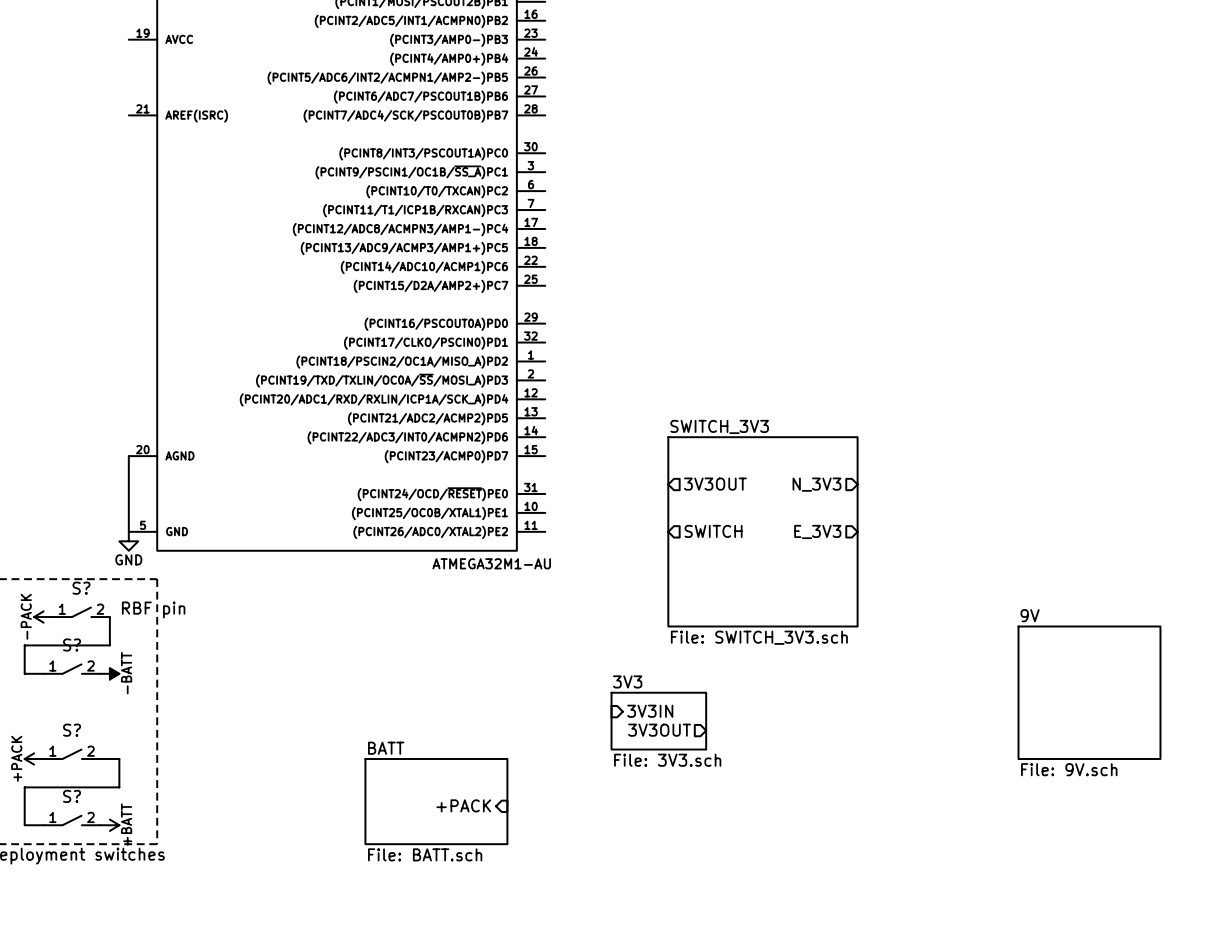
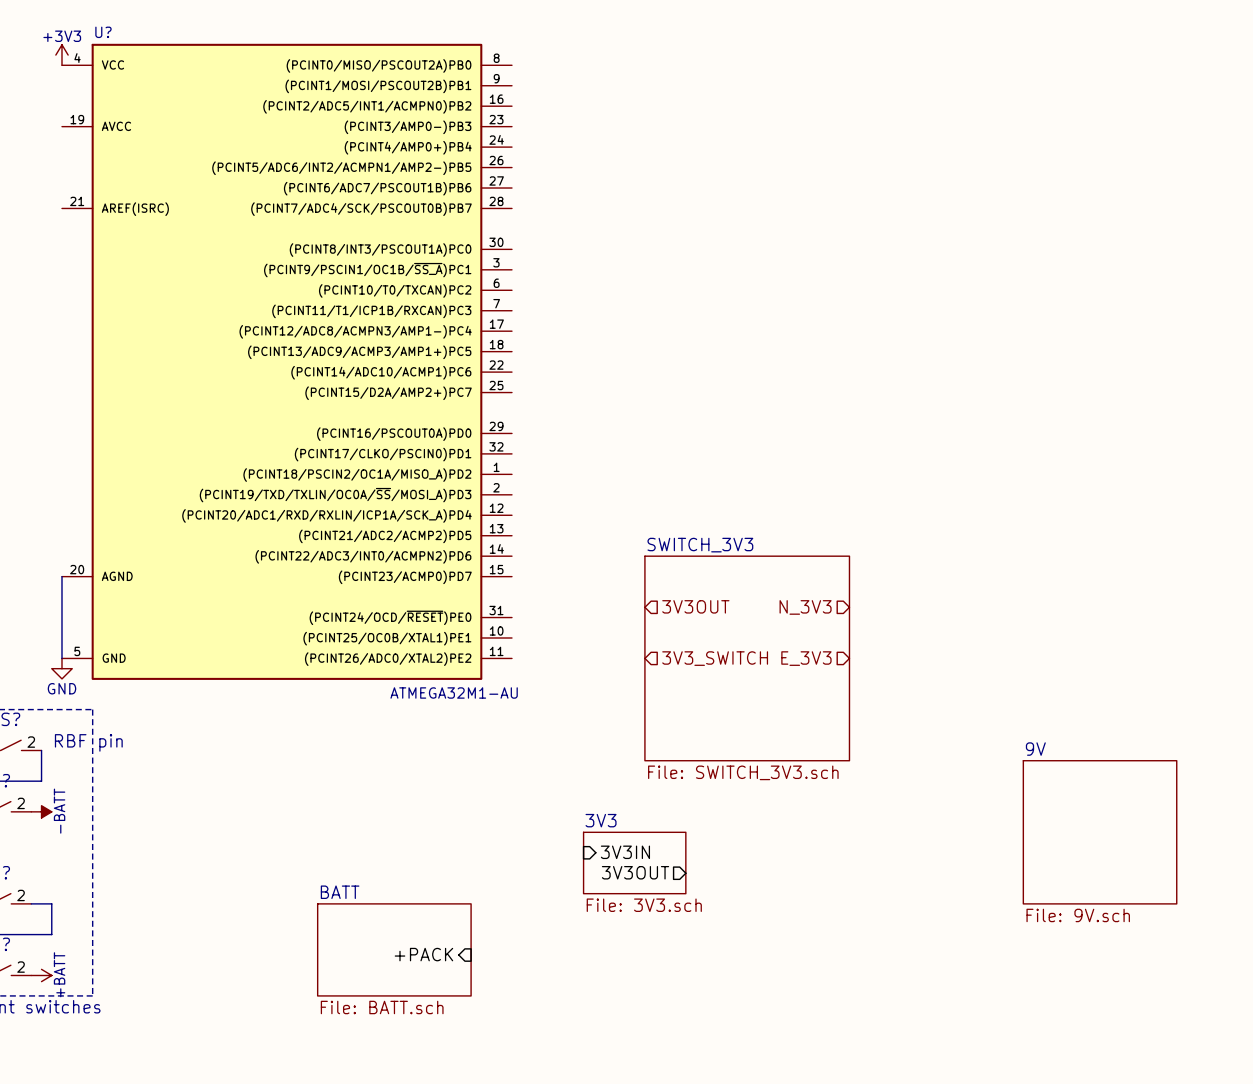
hierarchical label: SWITCH (713, 531) -> 3V3_SWITCH (715, 658)

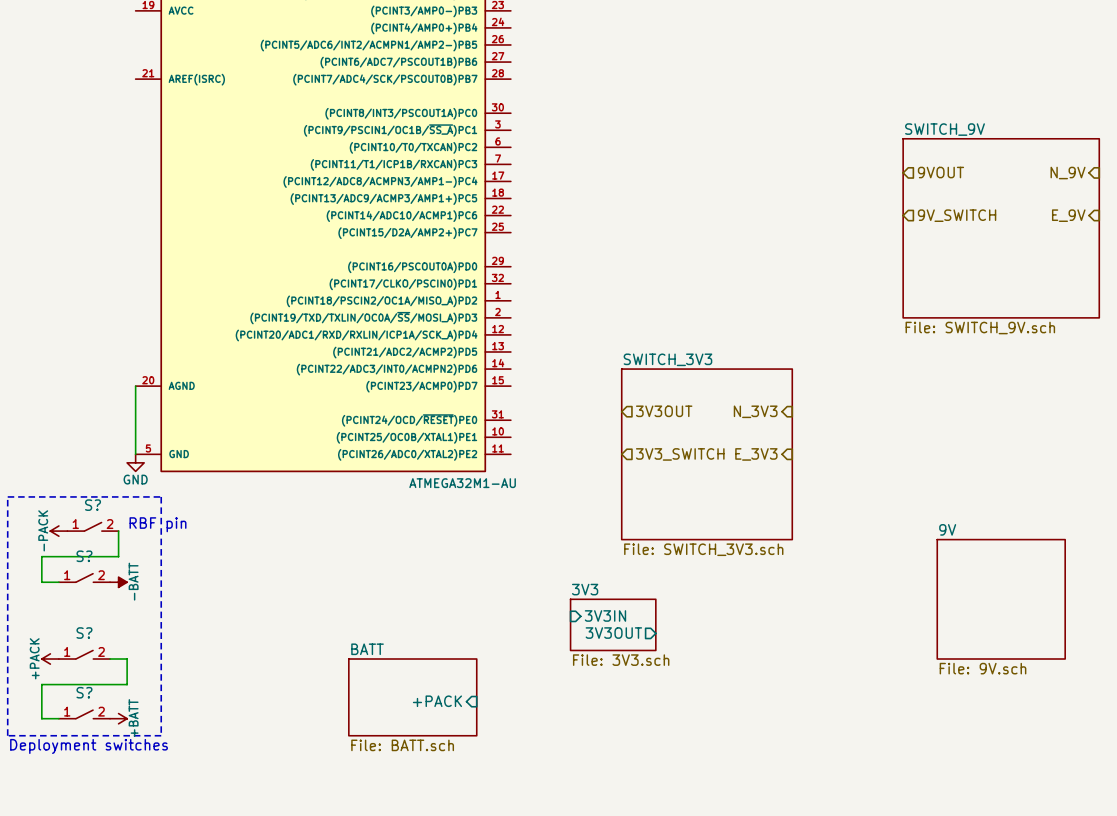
hierarchical label: none -> 9VOUT (940, 172)
hierarchical label: none -> N_9V (1068, 173)
hierarchical label: none -> 9V_SWITCH (957, 215)
hierarchical label: none -> E_9V (1068, 215)
sheet SWITCH_9V: none -> File: SWITCH_9V.sch (1001, 228)
hierarchical label shape: input (805, 607) -> output (755, 411)
hierarchical label shape: input (806, 658) -> output (756, 454)

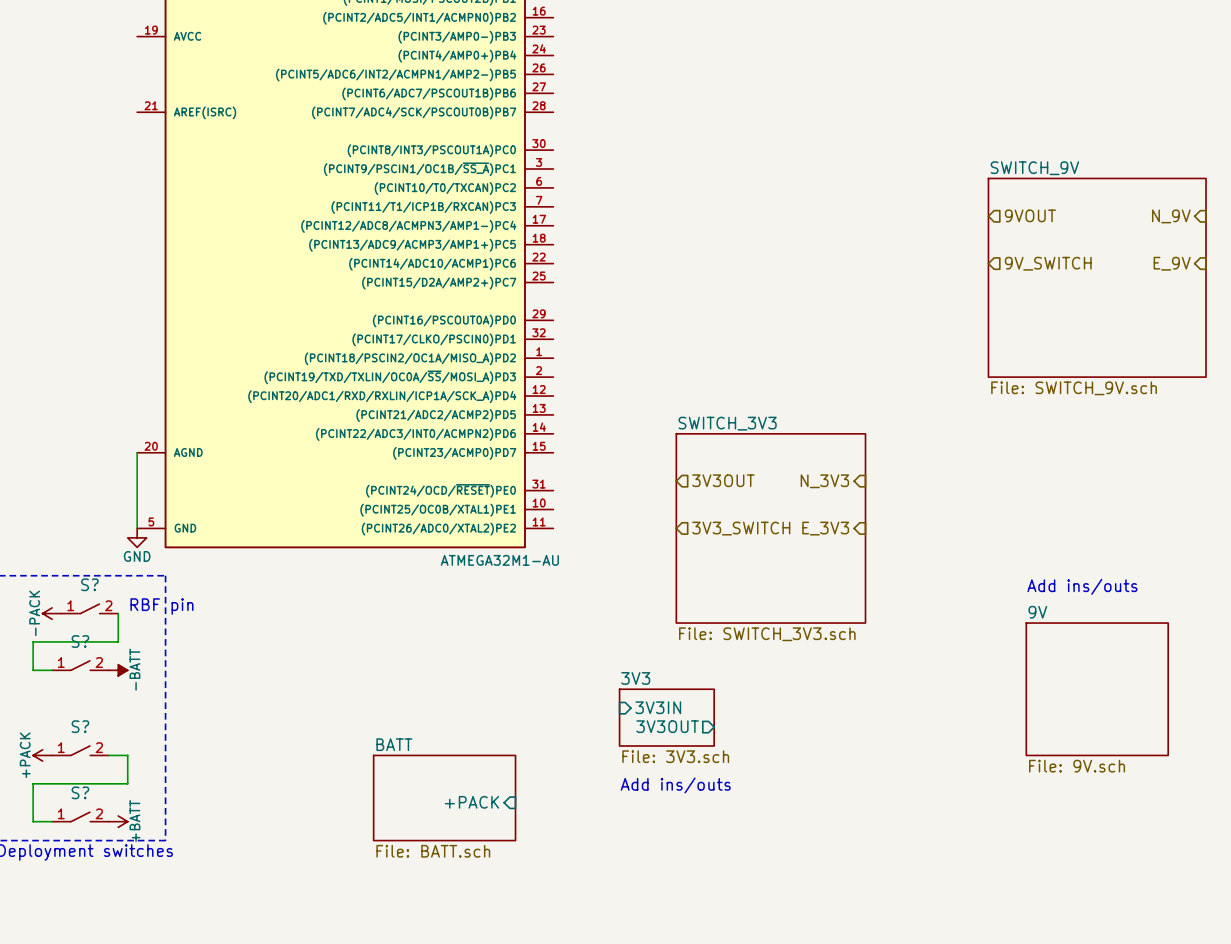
text: none -> Add ins/outs (1082, 586)
text: none -> Add ins/outs (675, 785)

